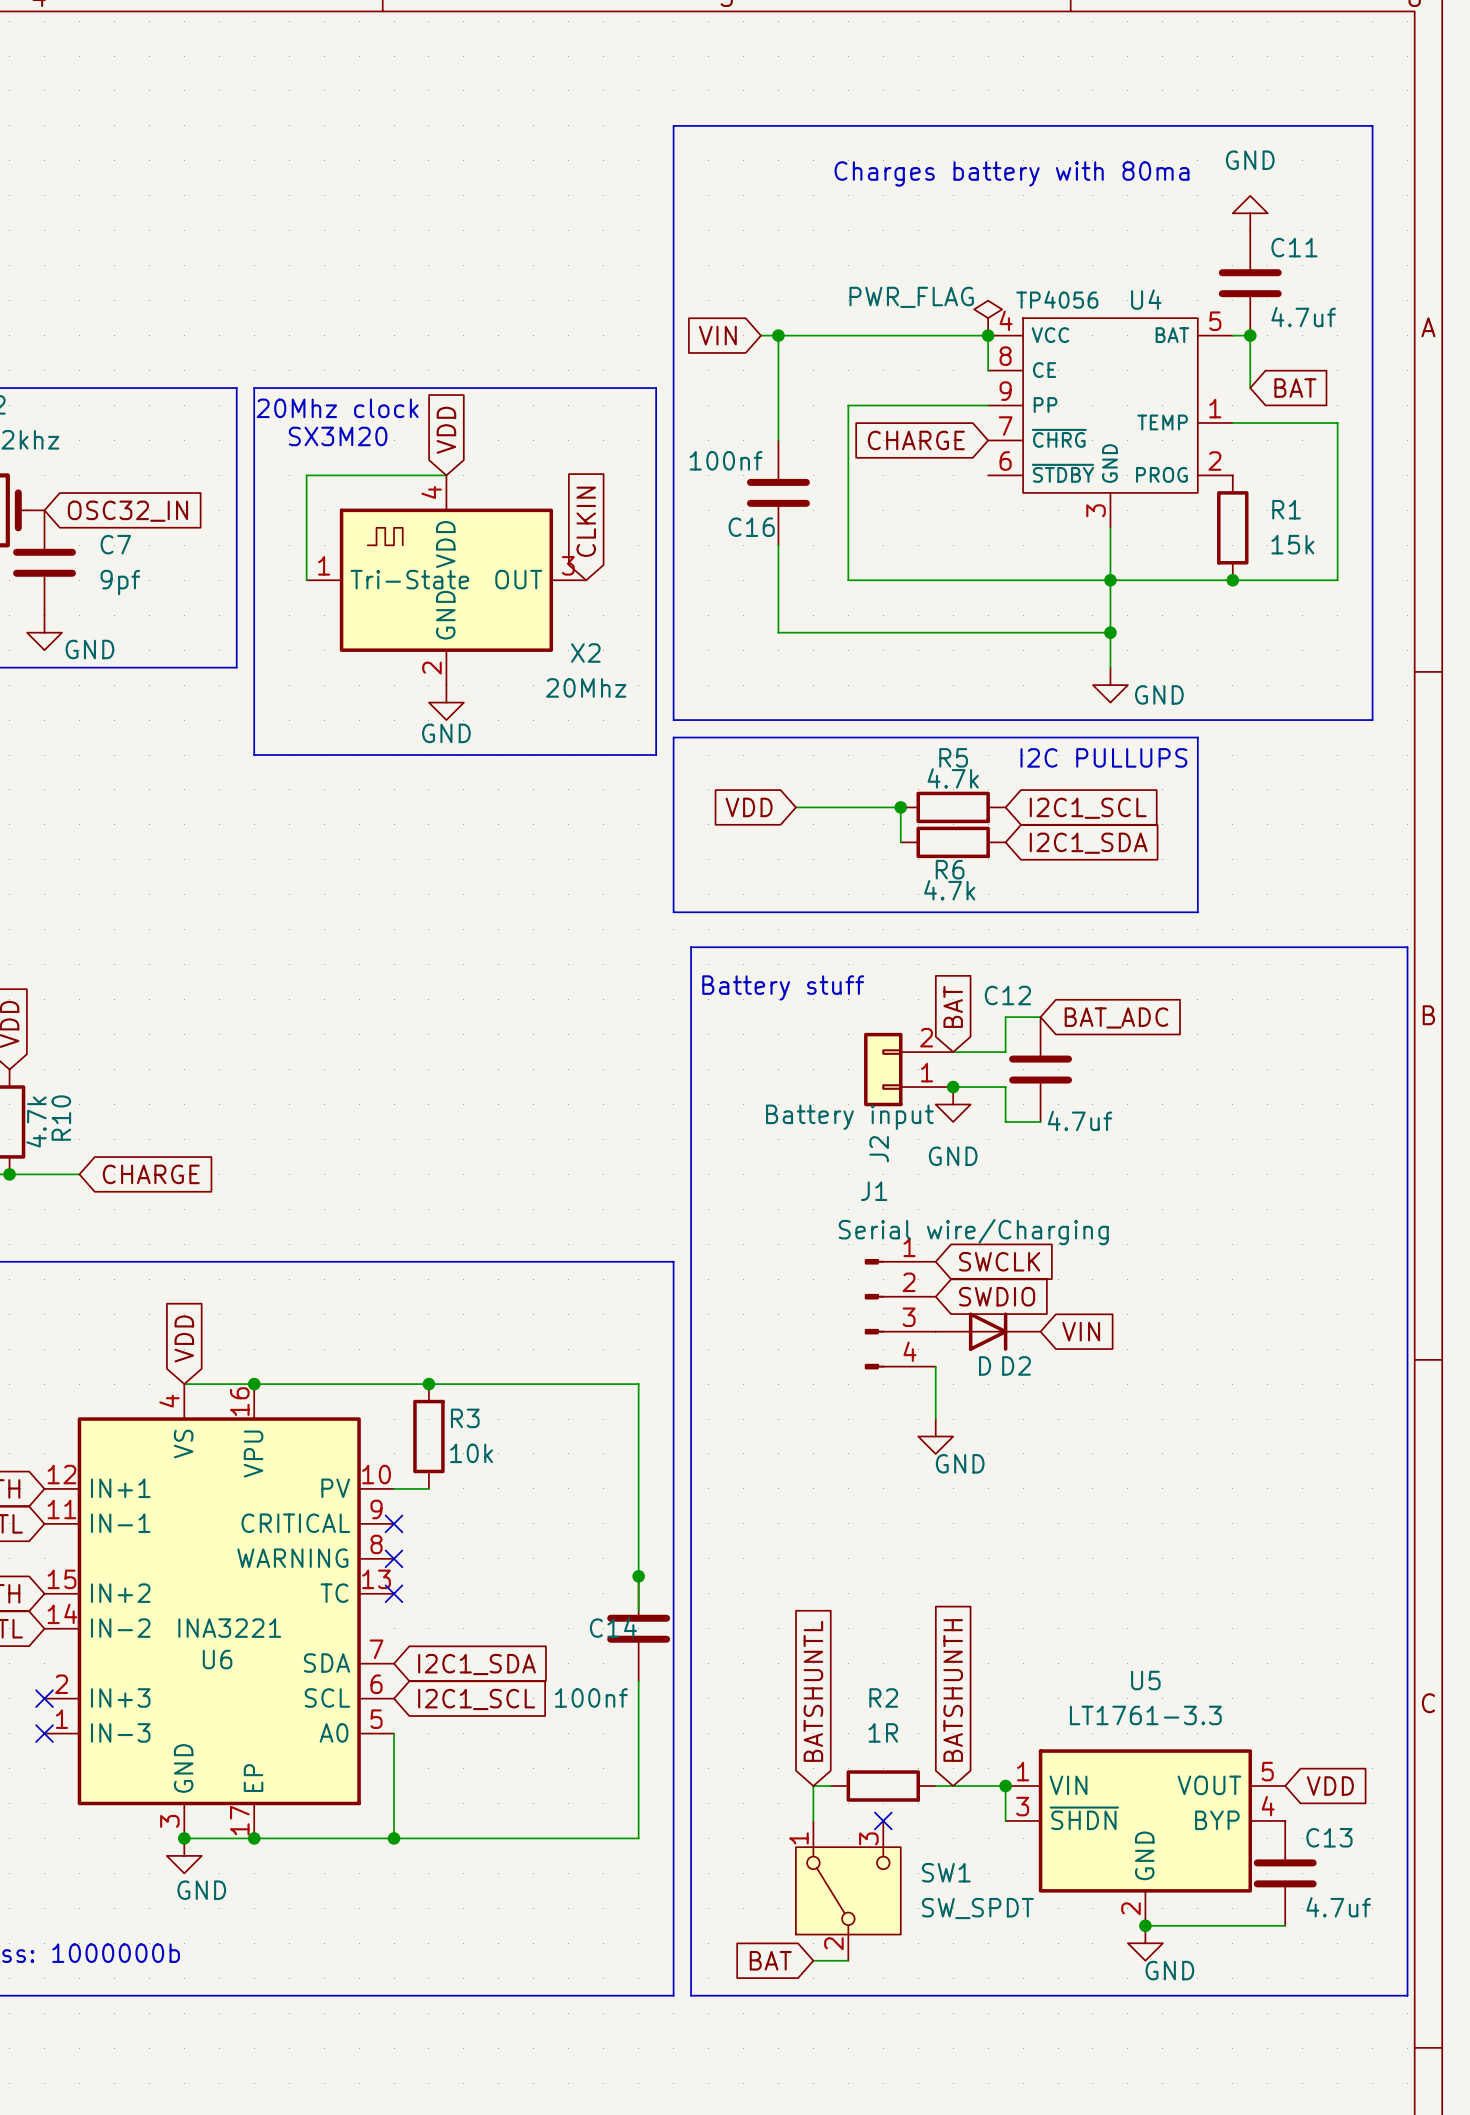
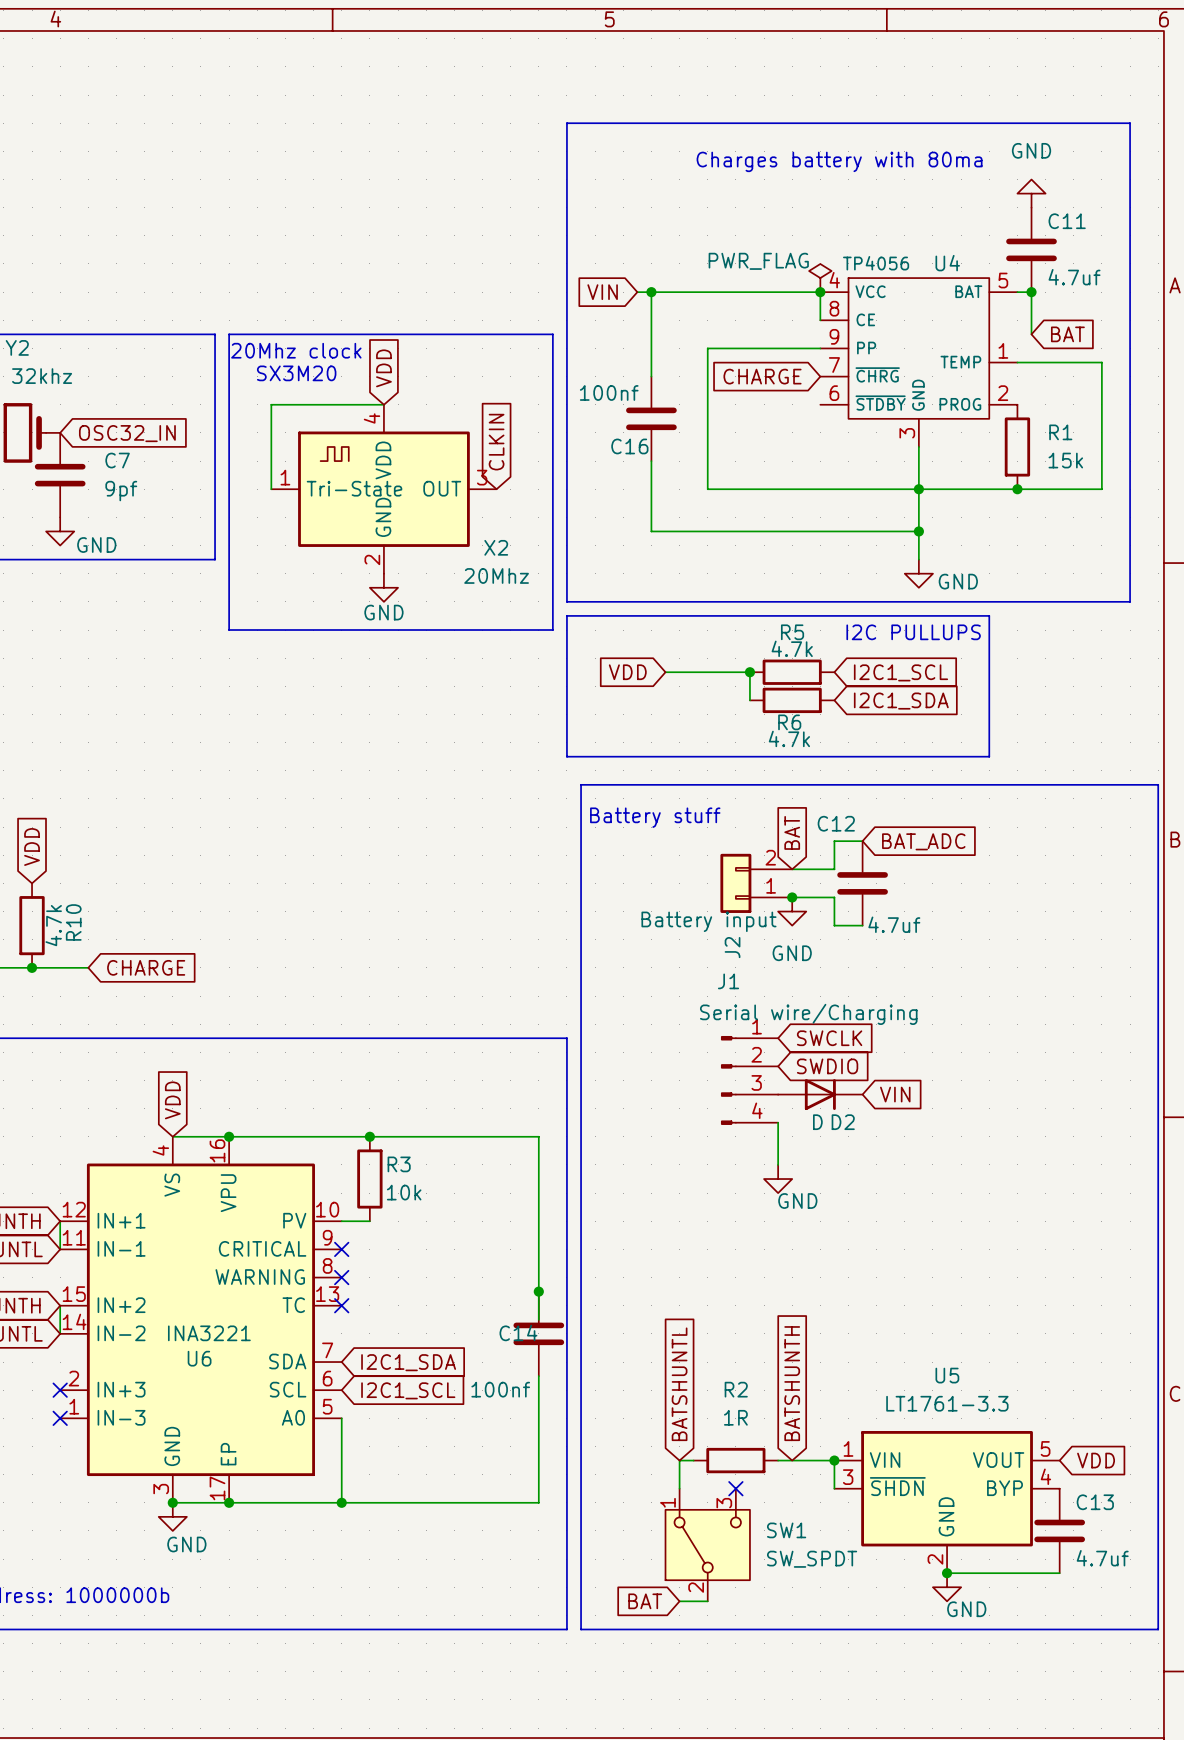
wire: none -> (60, 1221) (60, 1249)
wire: none -> (60, 1305) (60, 1333)

